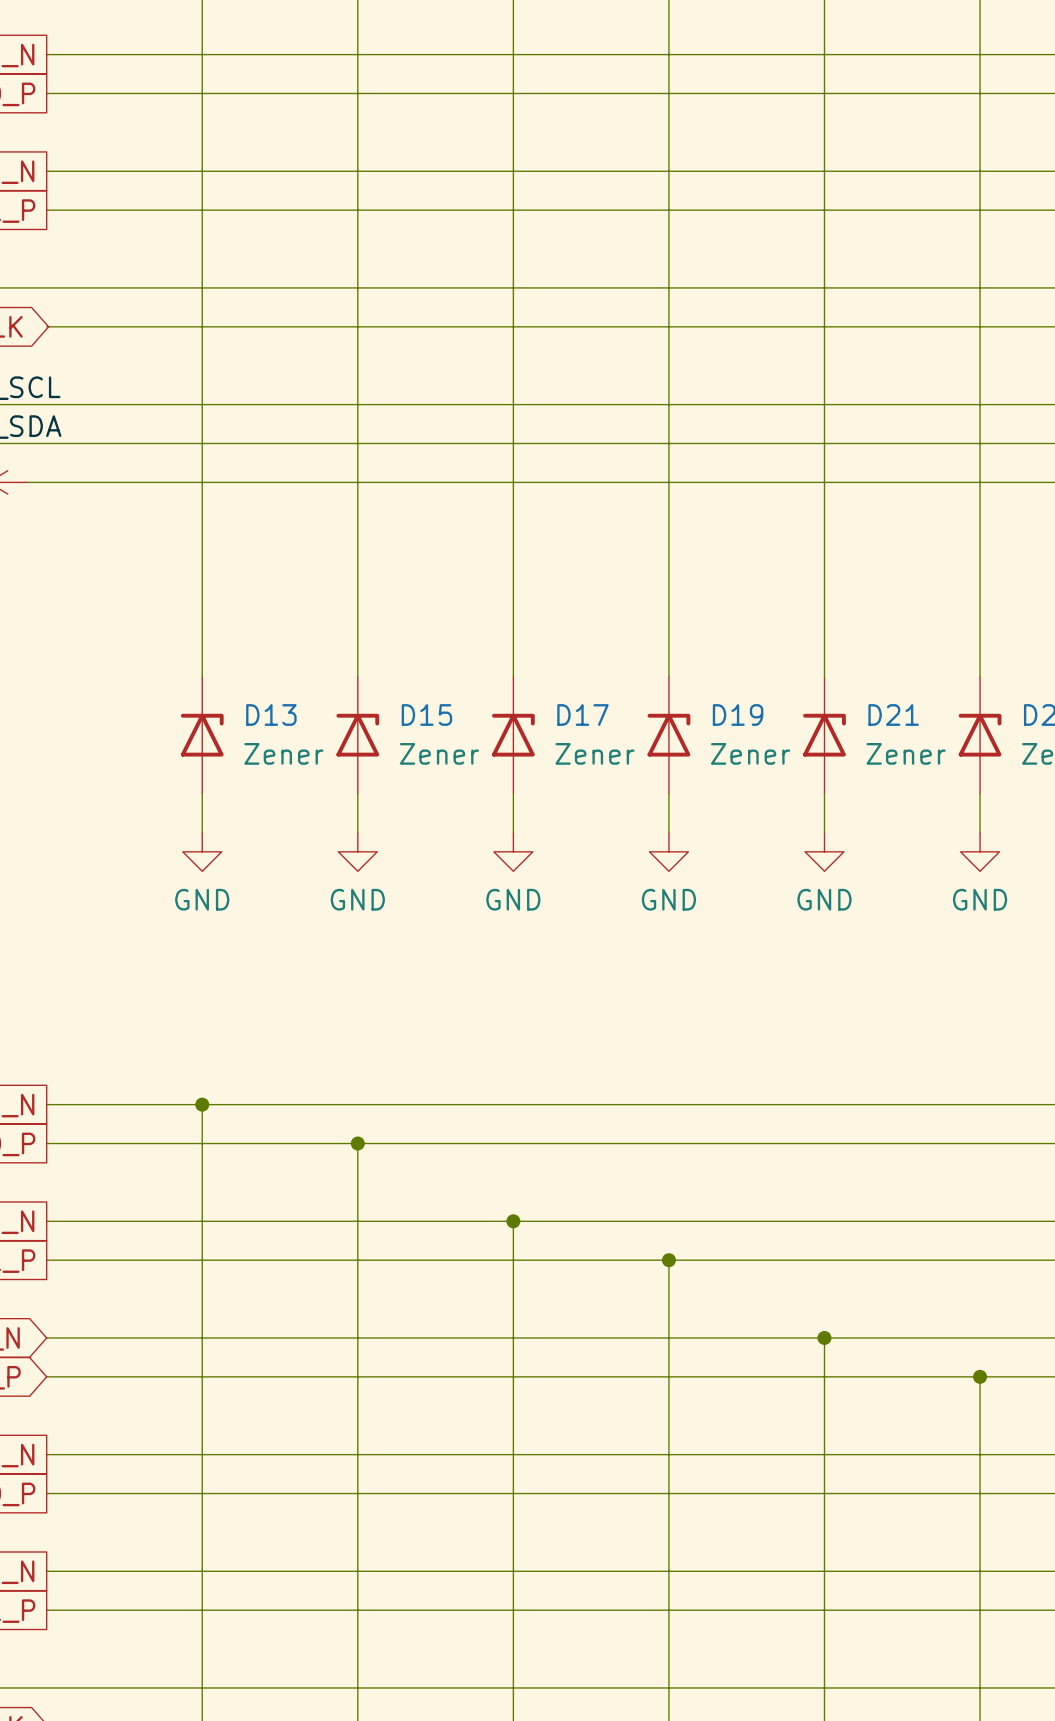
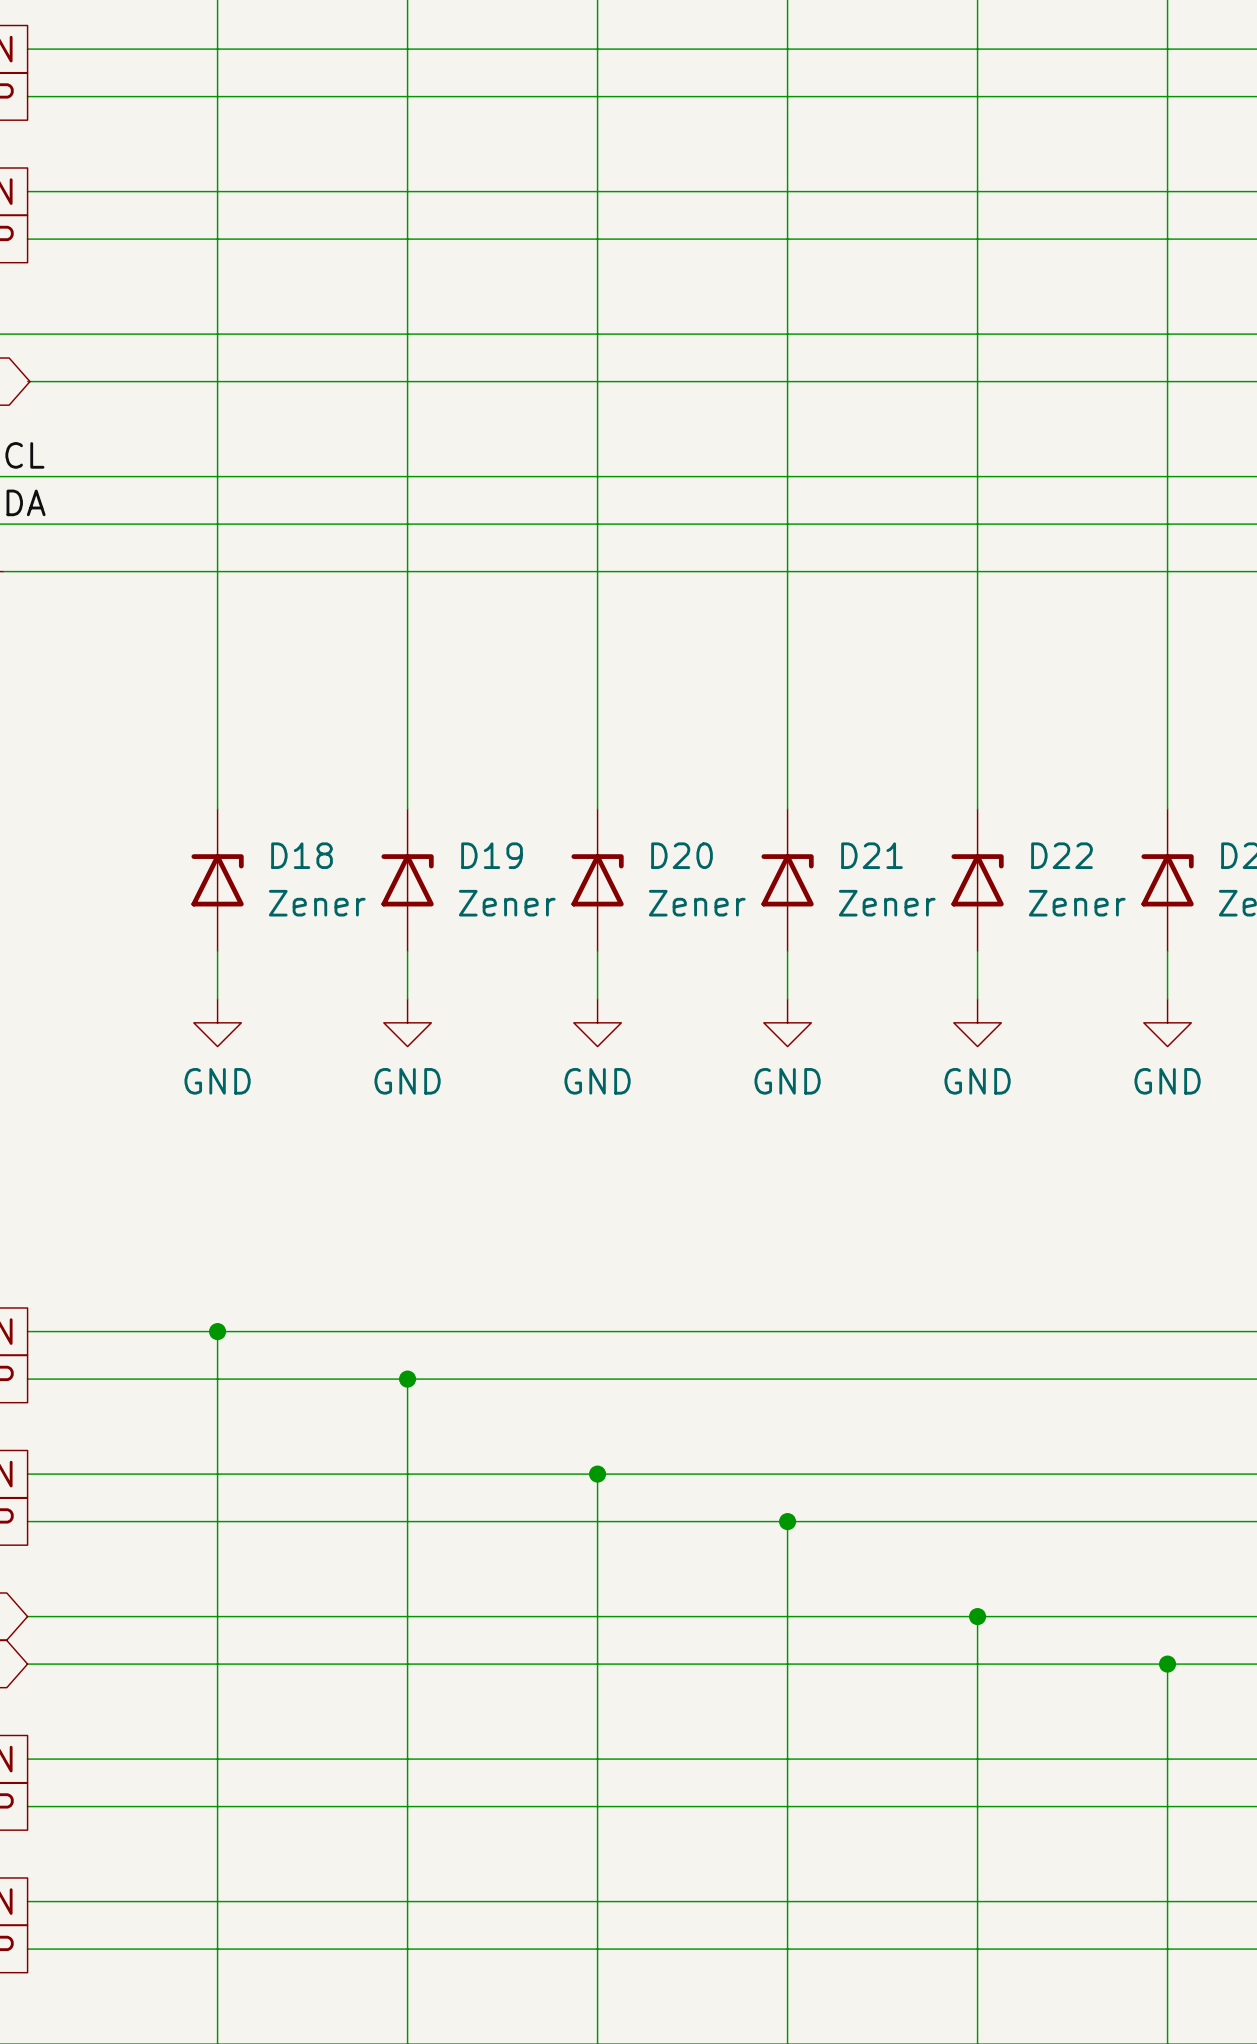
D13 name: D13 (271, 715) -> D18 (302, 855)
D15 name: D15 (426, 715) -> D19 (492, 855)
D17 name: D17 (582, 715) -> D20 (682, 855)
D19 name: D19 (738, 715) -> D21 (872, 855)
D21 name: D21 (893, 715) -> D22 (1062, 855)

